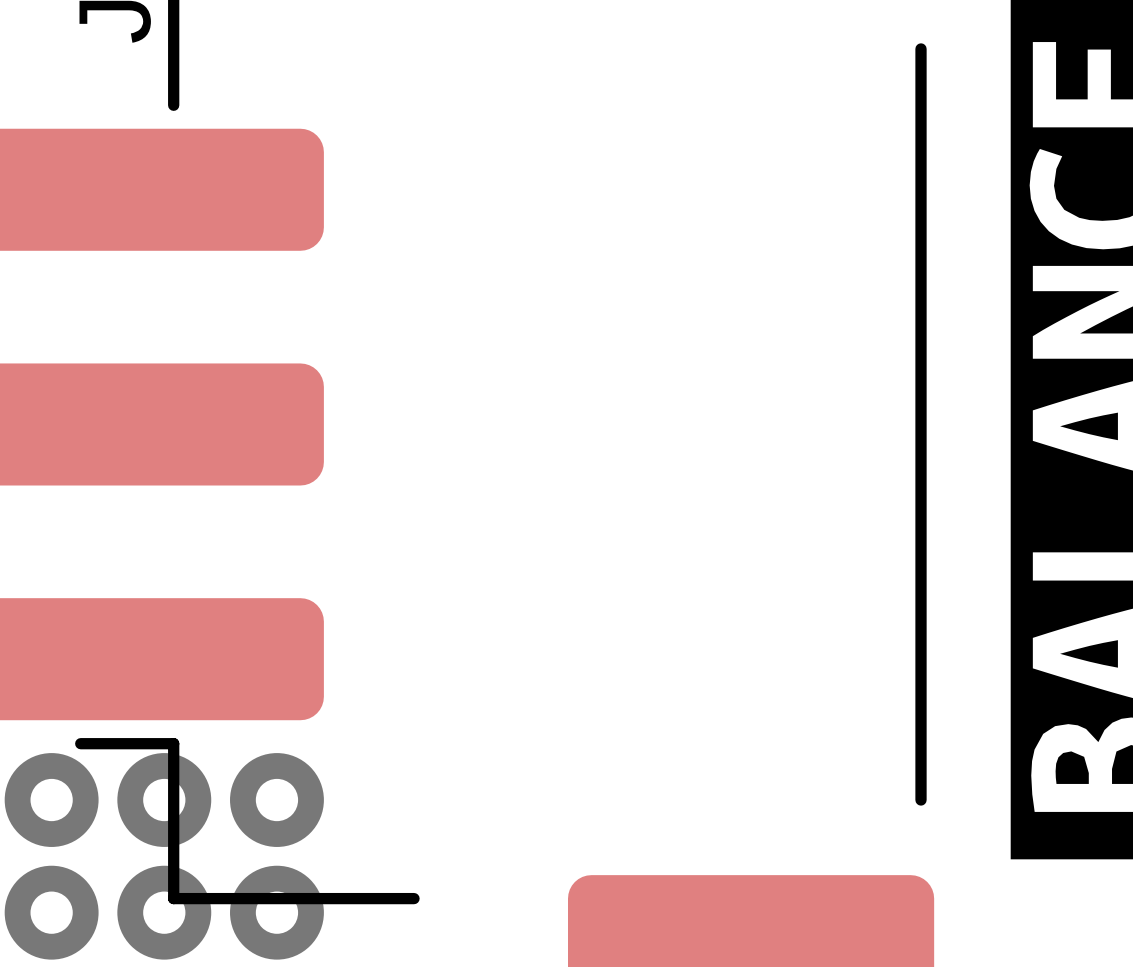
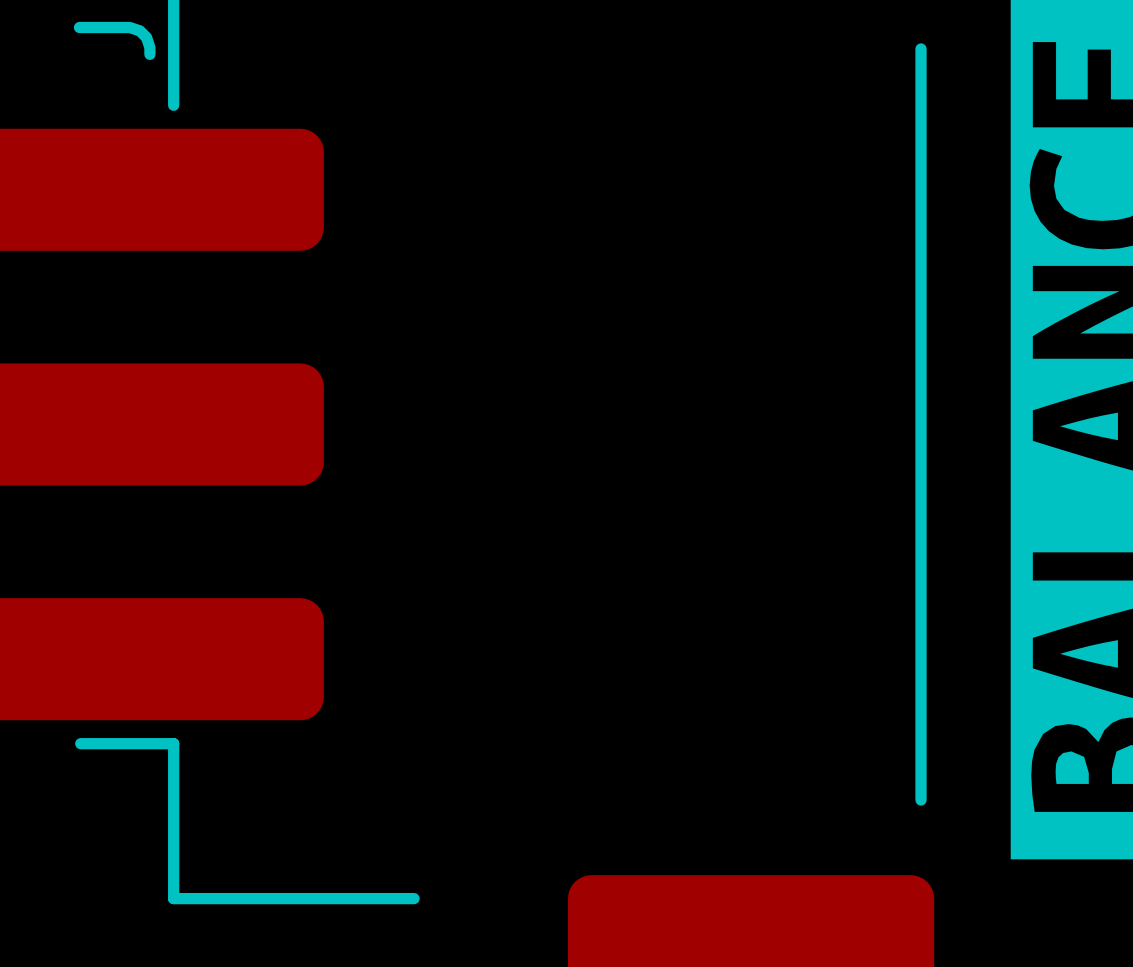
via: (51, 800) -> none
via: (164, 800) -> none
via: (276, 800) -> none
via: (51, 912) -> none
via: (164, 912) -> none
via: (276, 912) -> none

